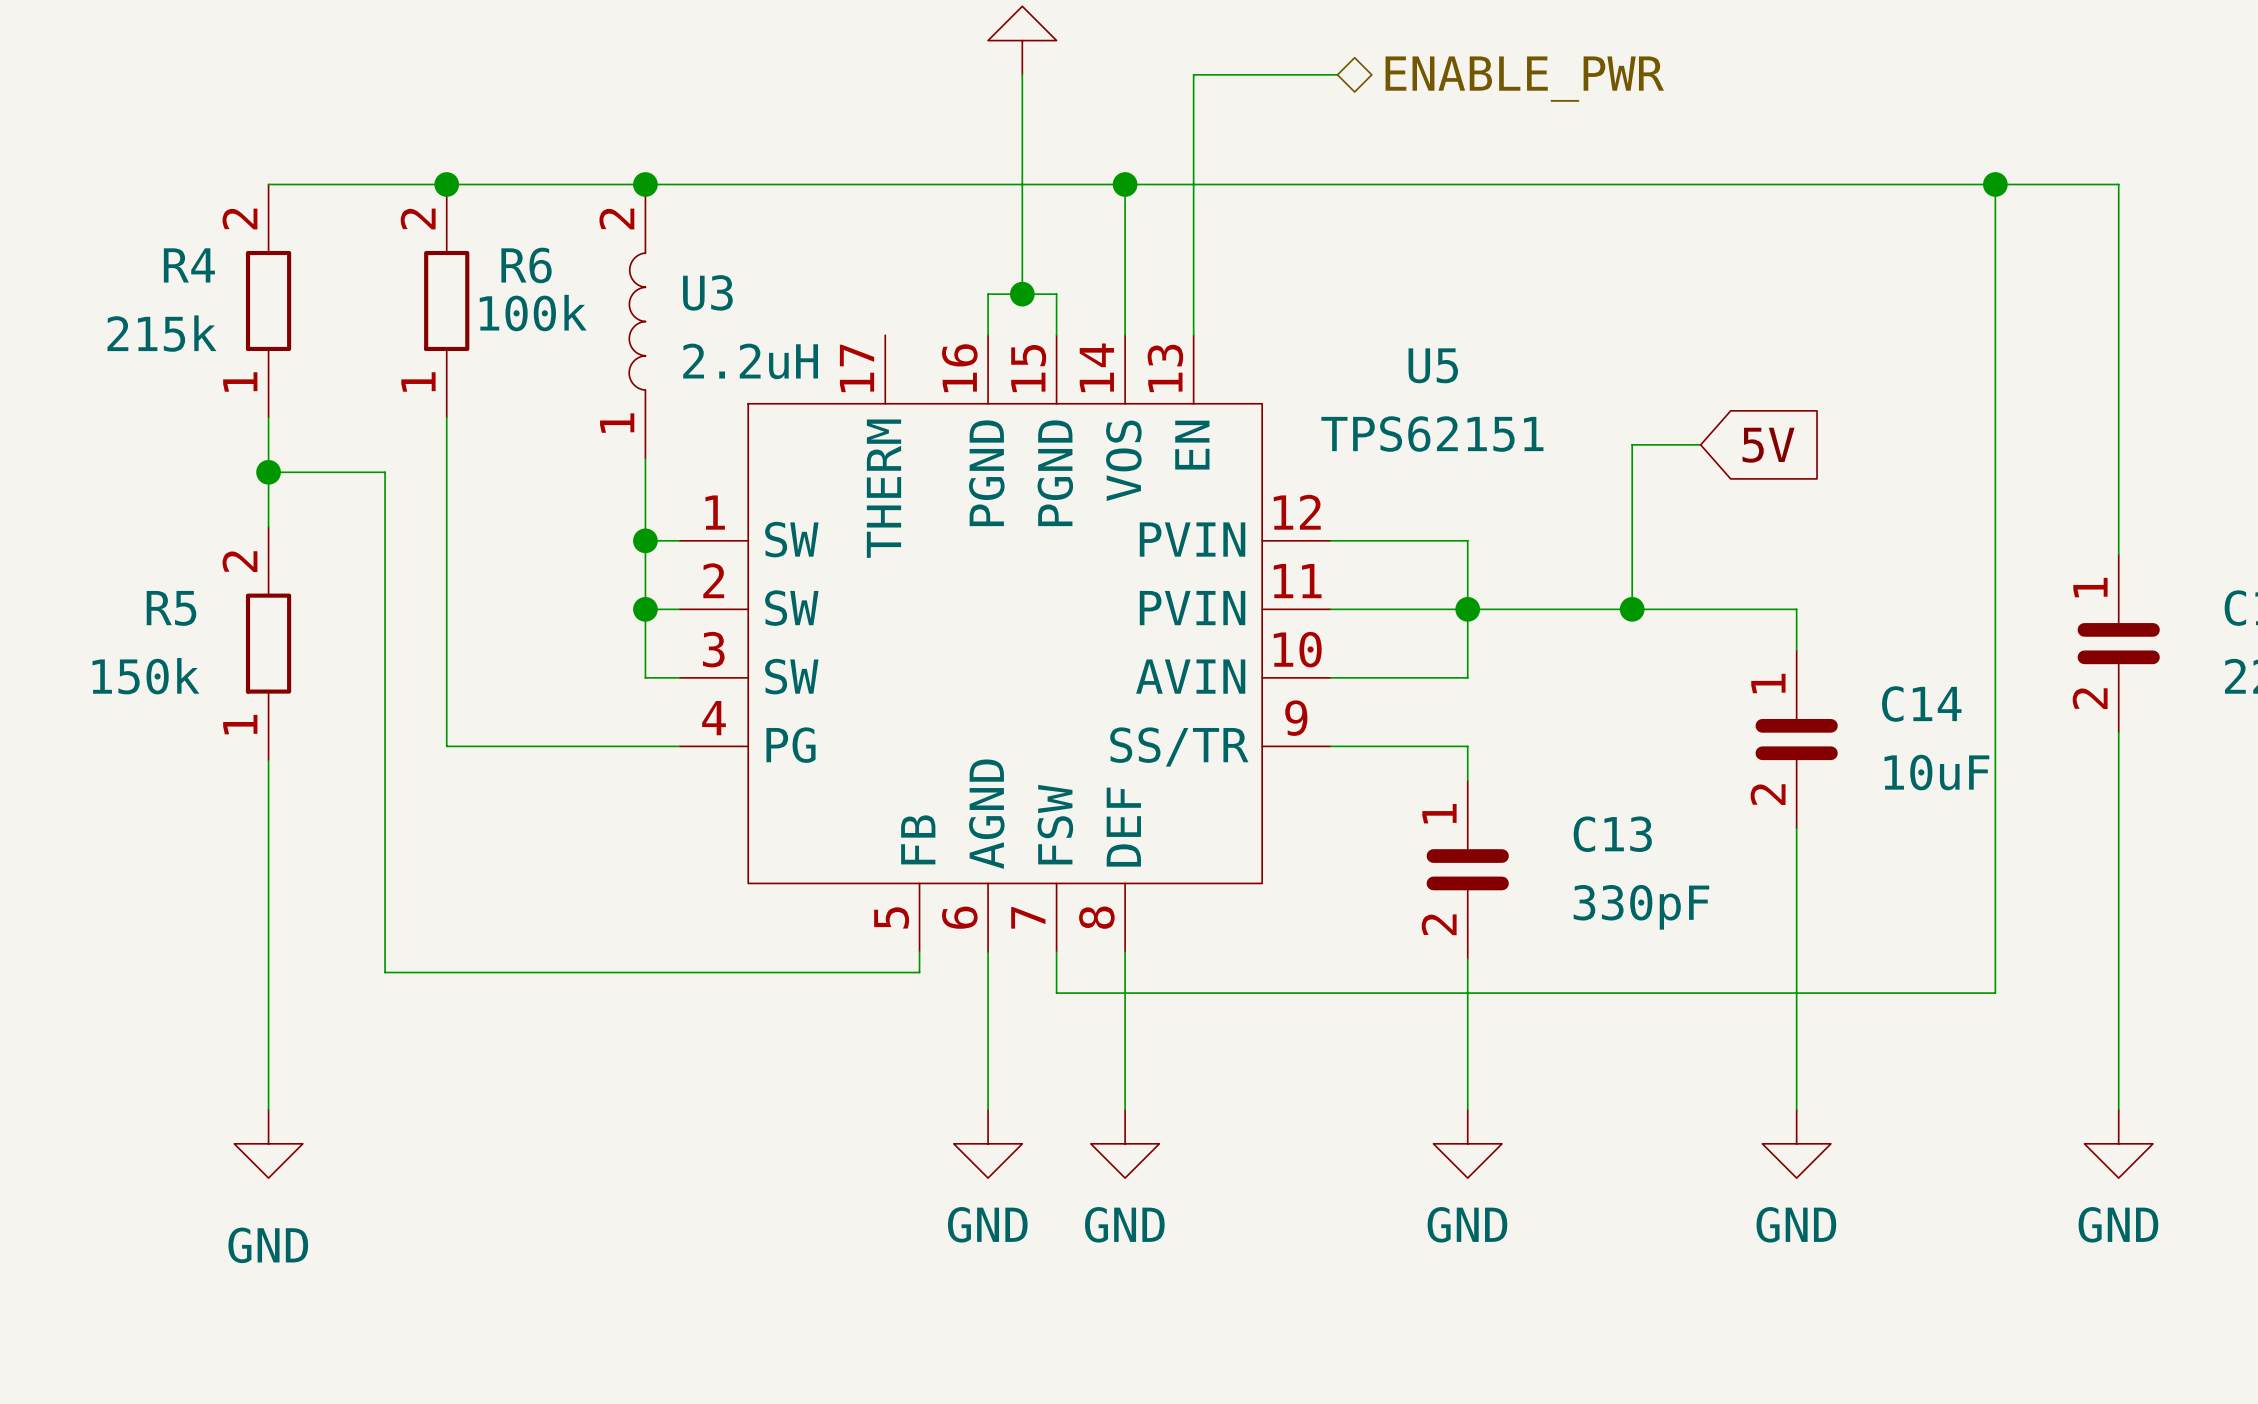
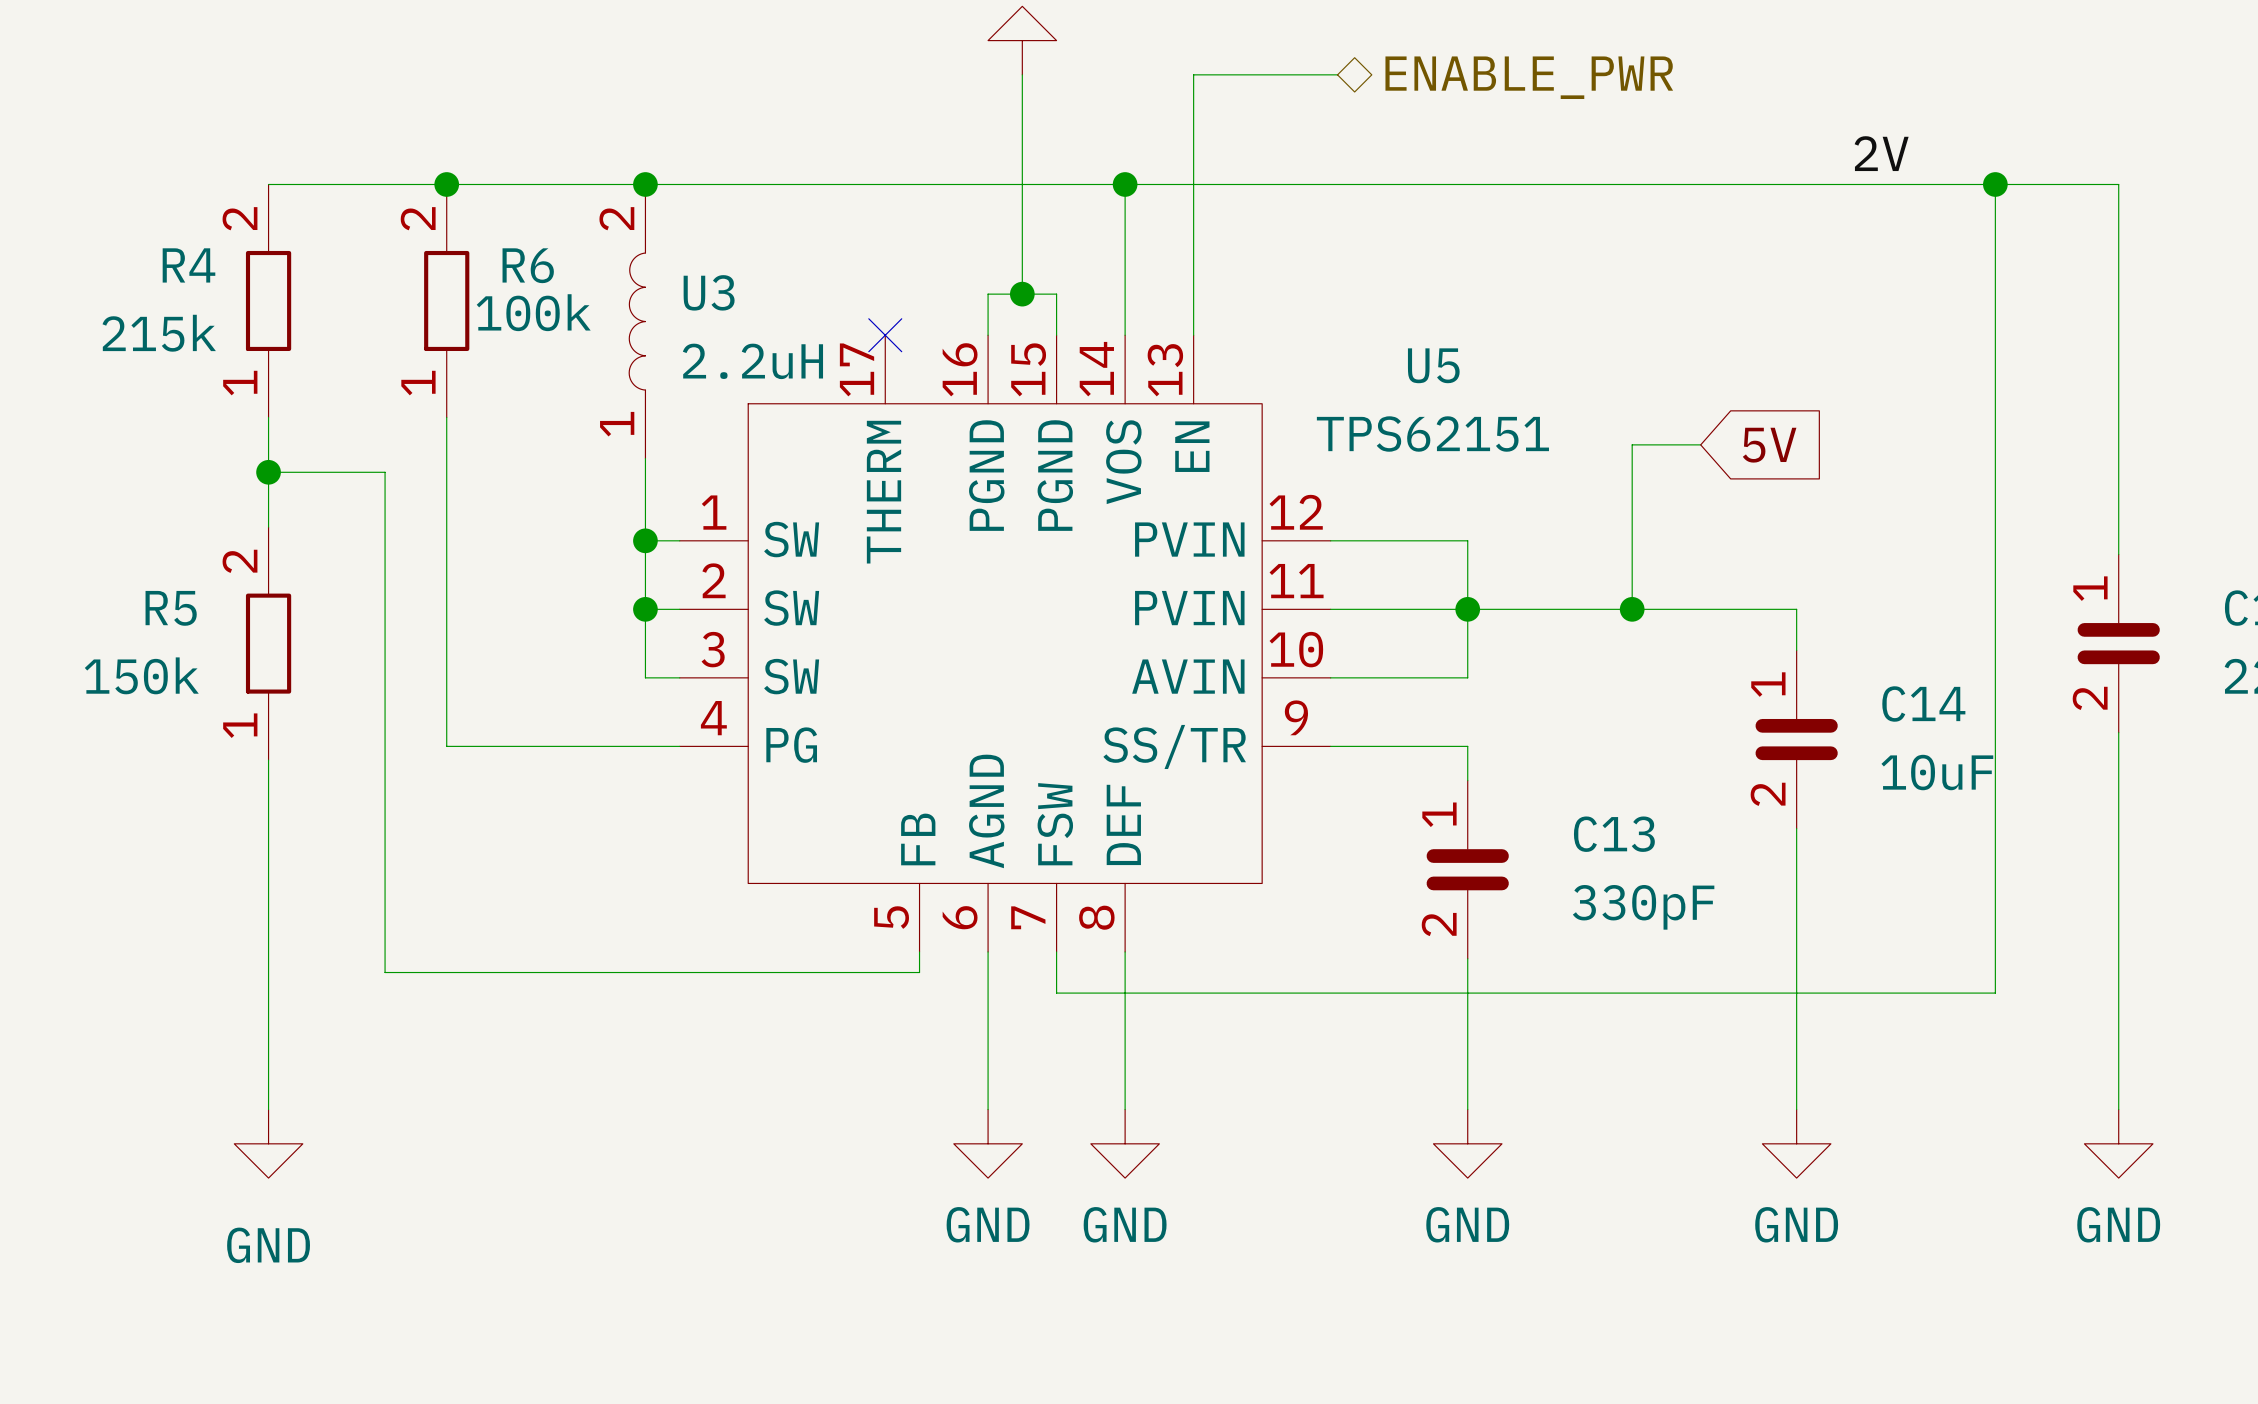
label: none -> 2V (1881, 153)
no-connect mark: none -> (885, 335)

